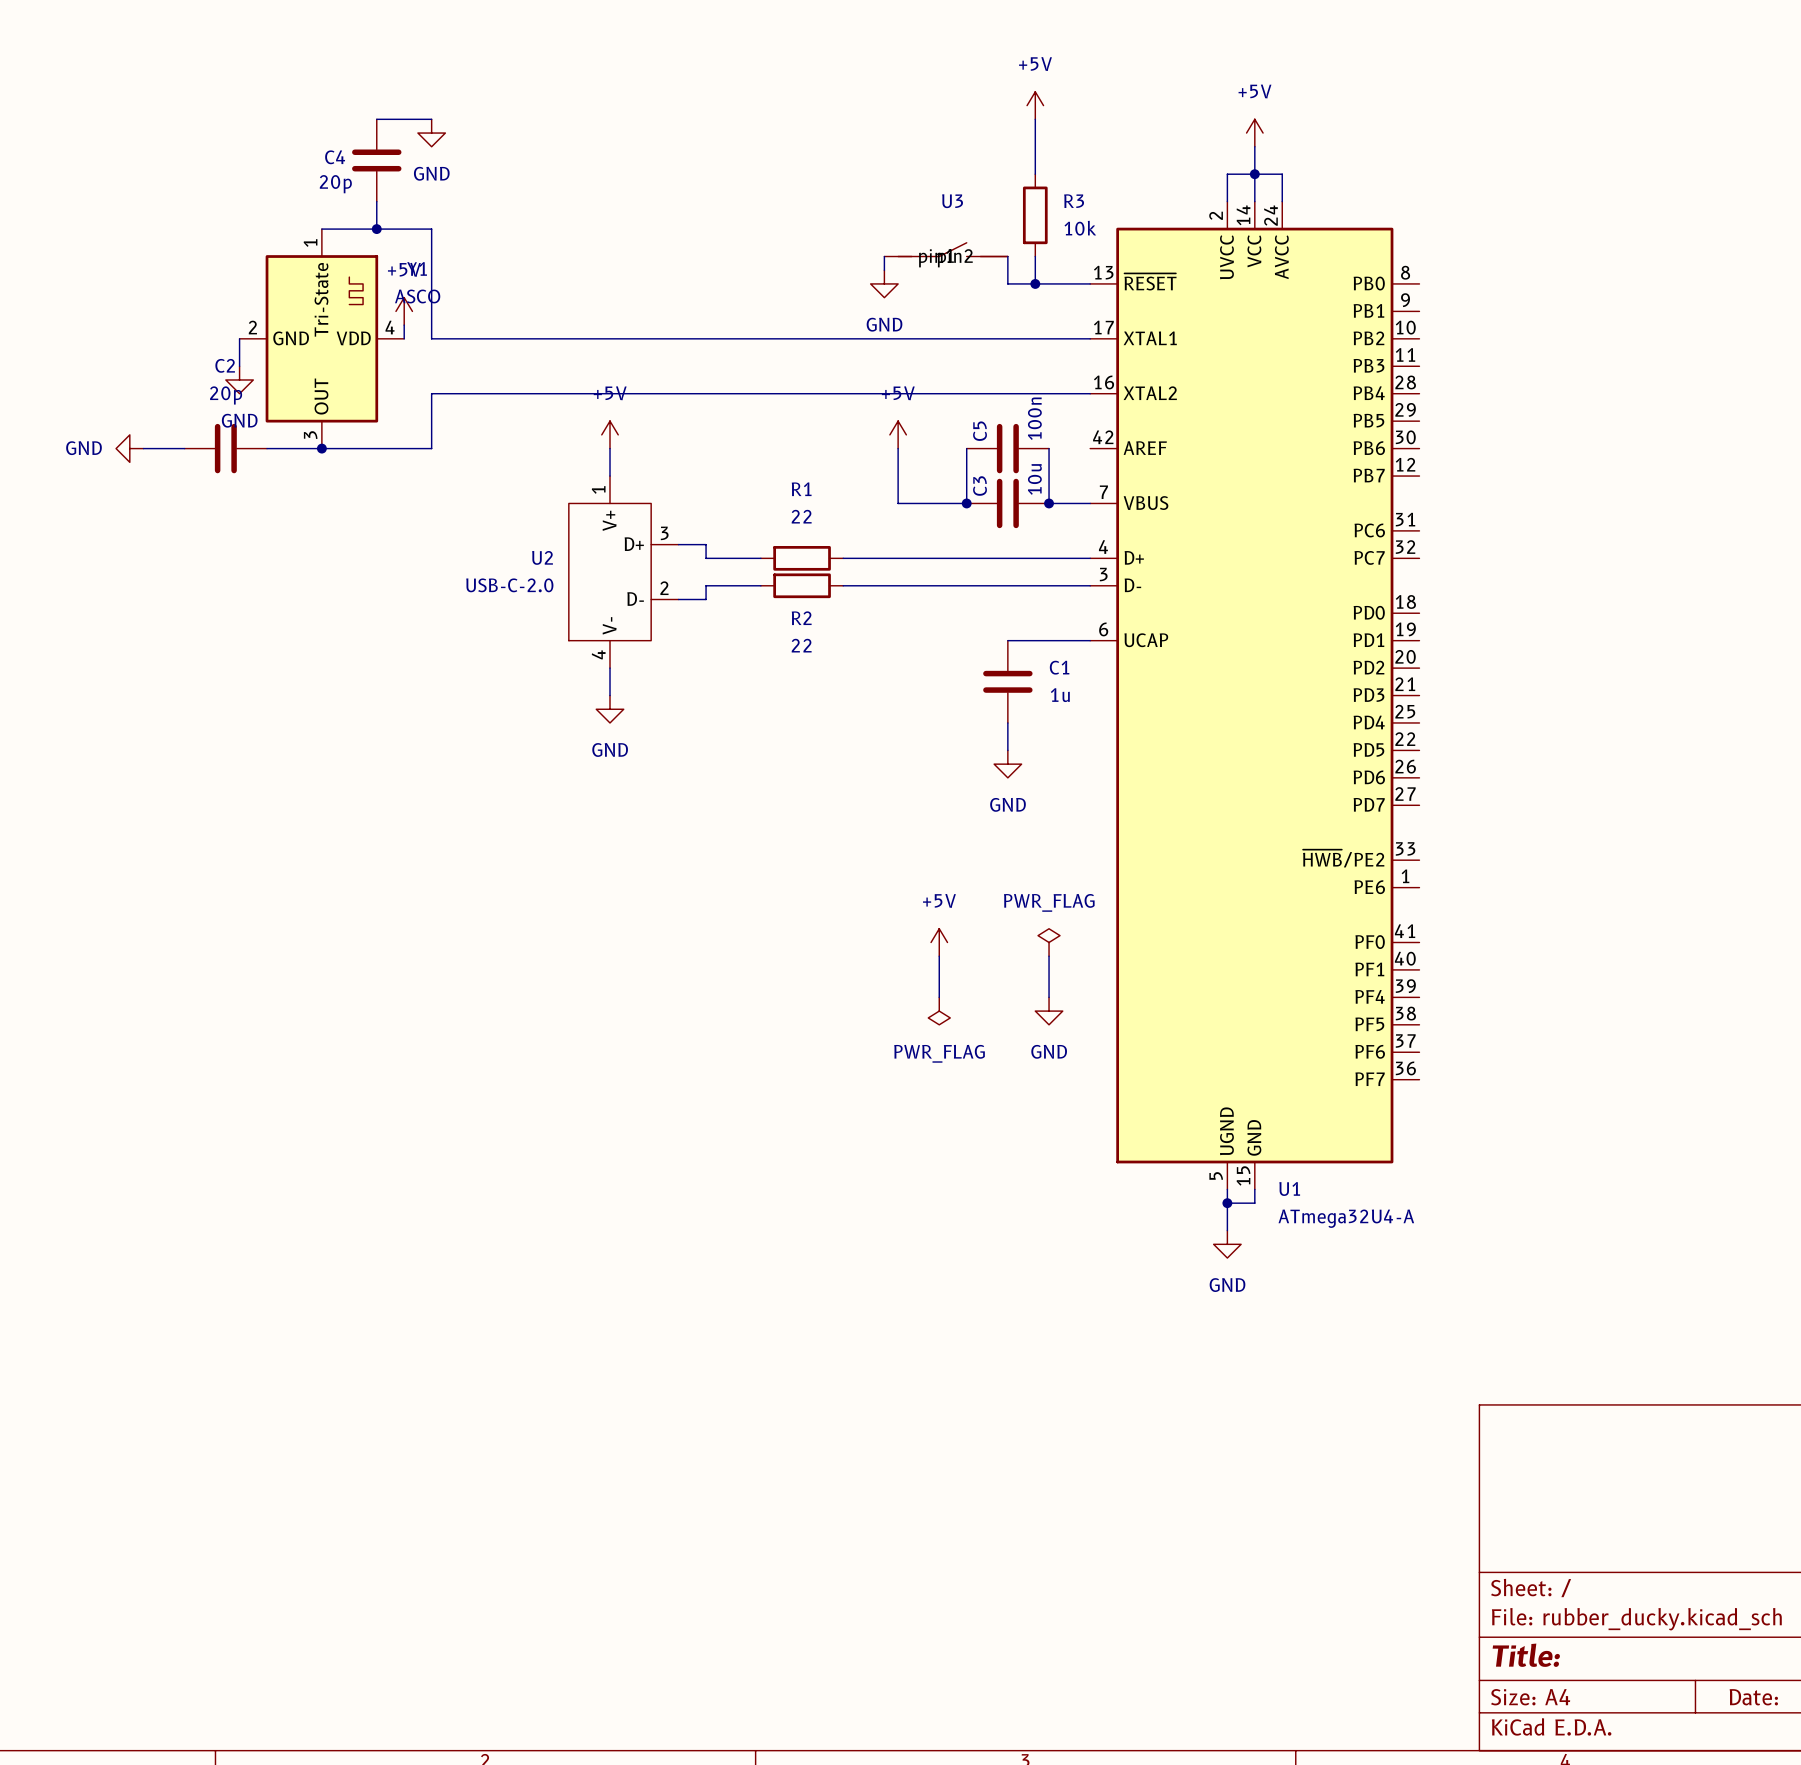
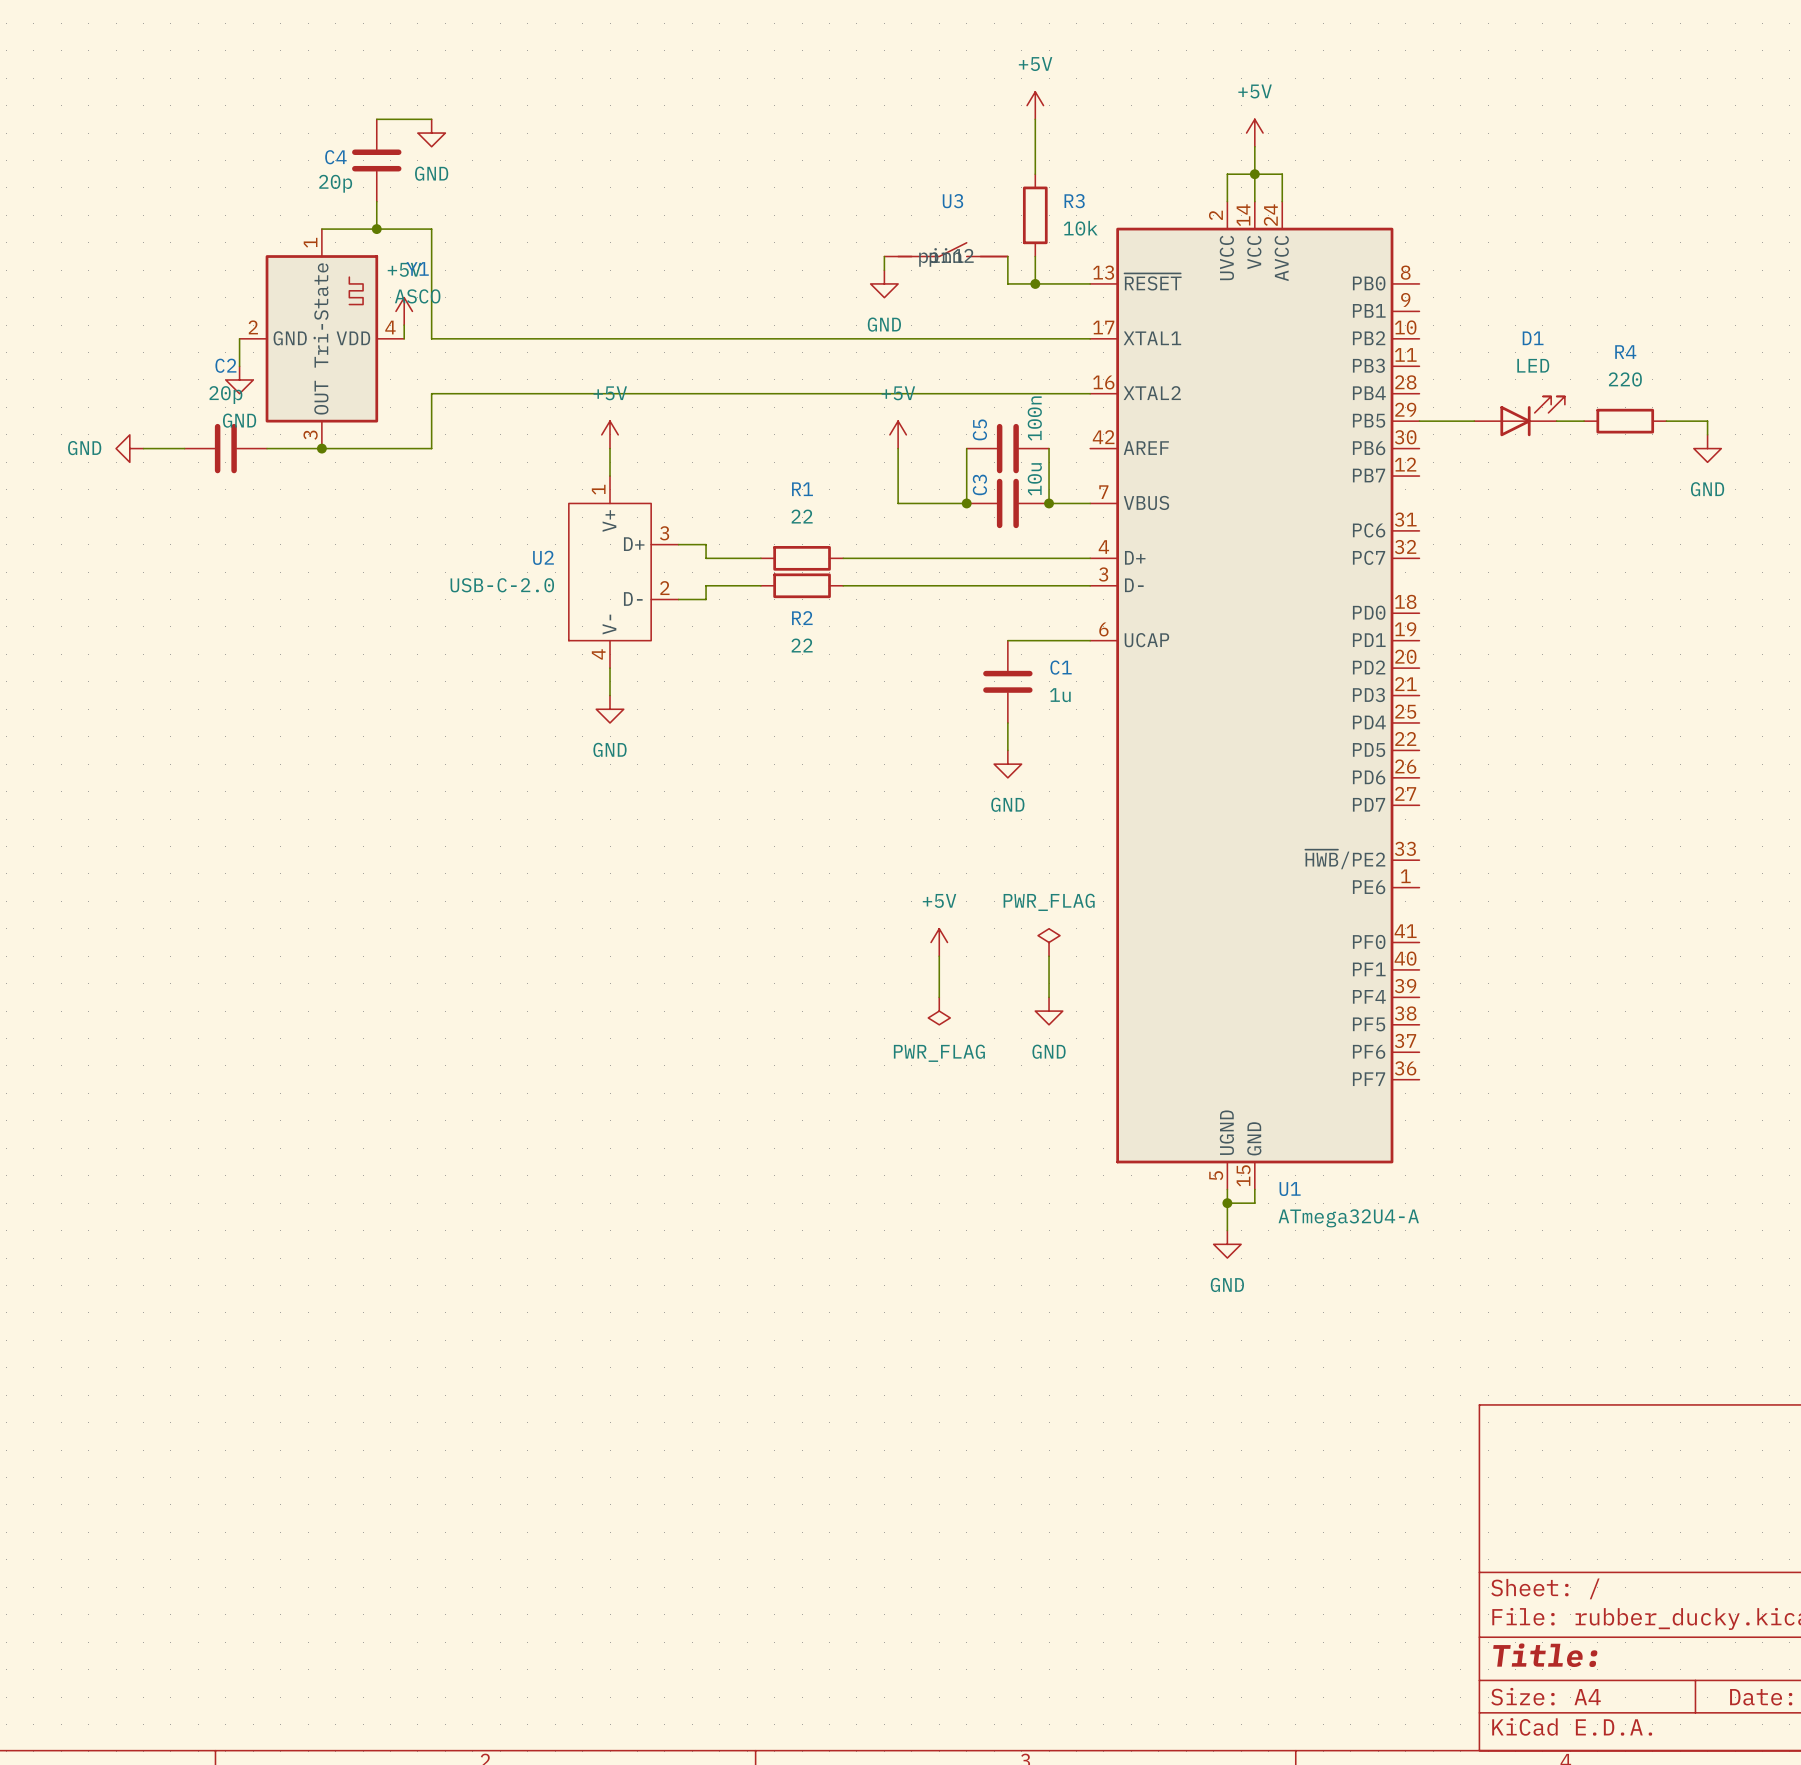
D1: none -> LED (1519, 416)
wire: none -> (1419, 421) (1474, 421)
wire: none -> (1556, 421) (1584, 421)
R4: none -> 220 (1625, 421)
wire: none -> (1666, 421) (1707, 421) (1707, 434)
power symbol: none -> GND (1707, 448)

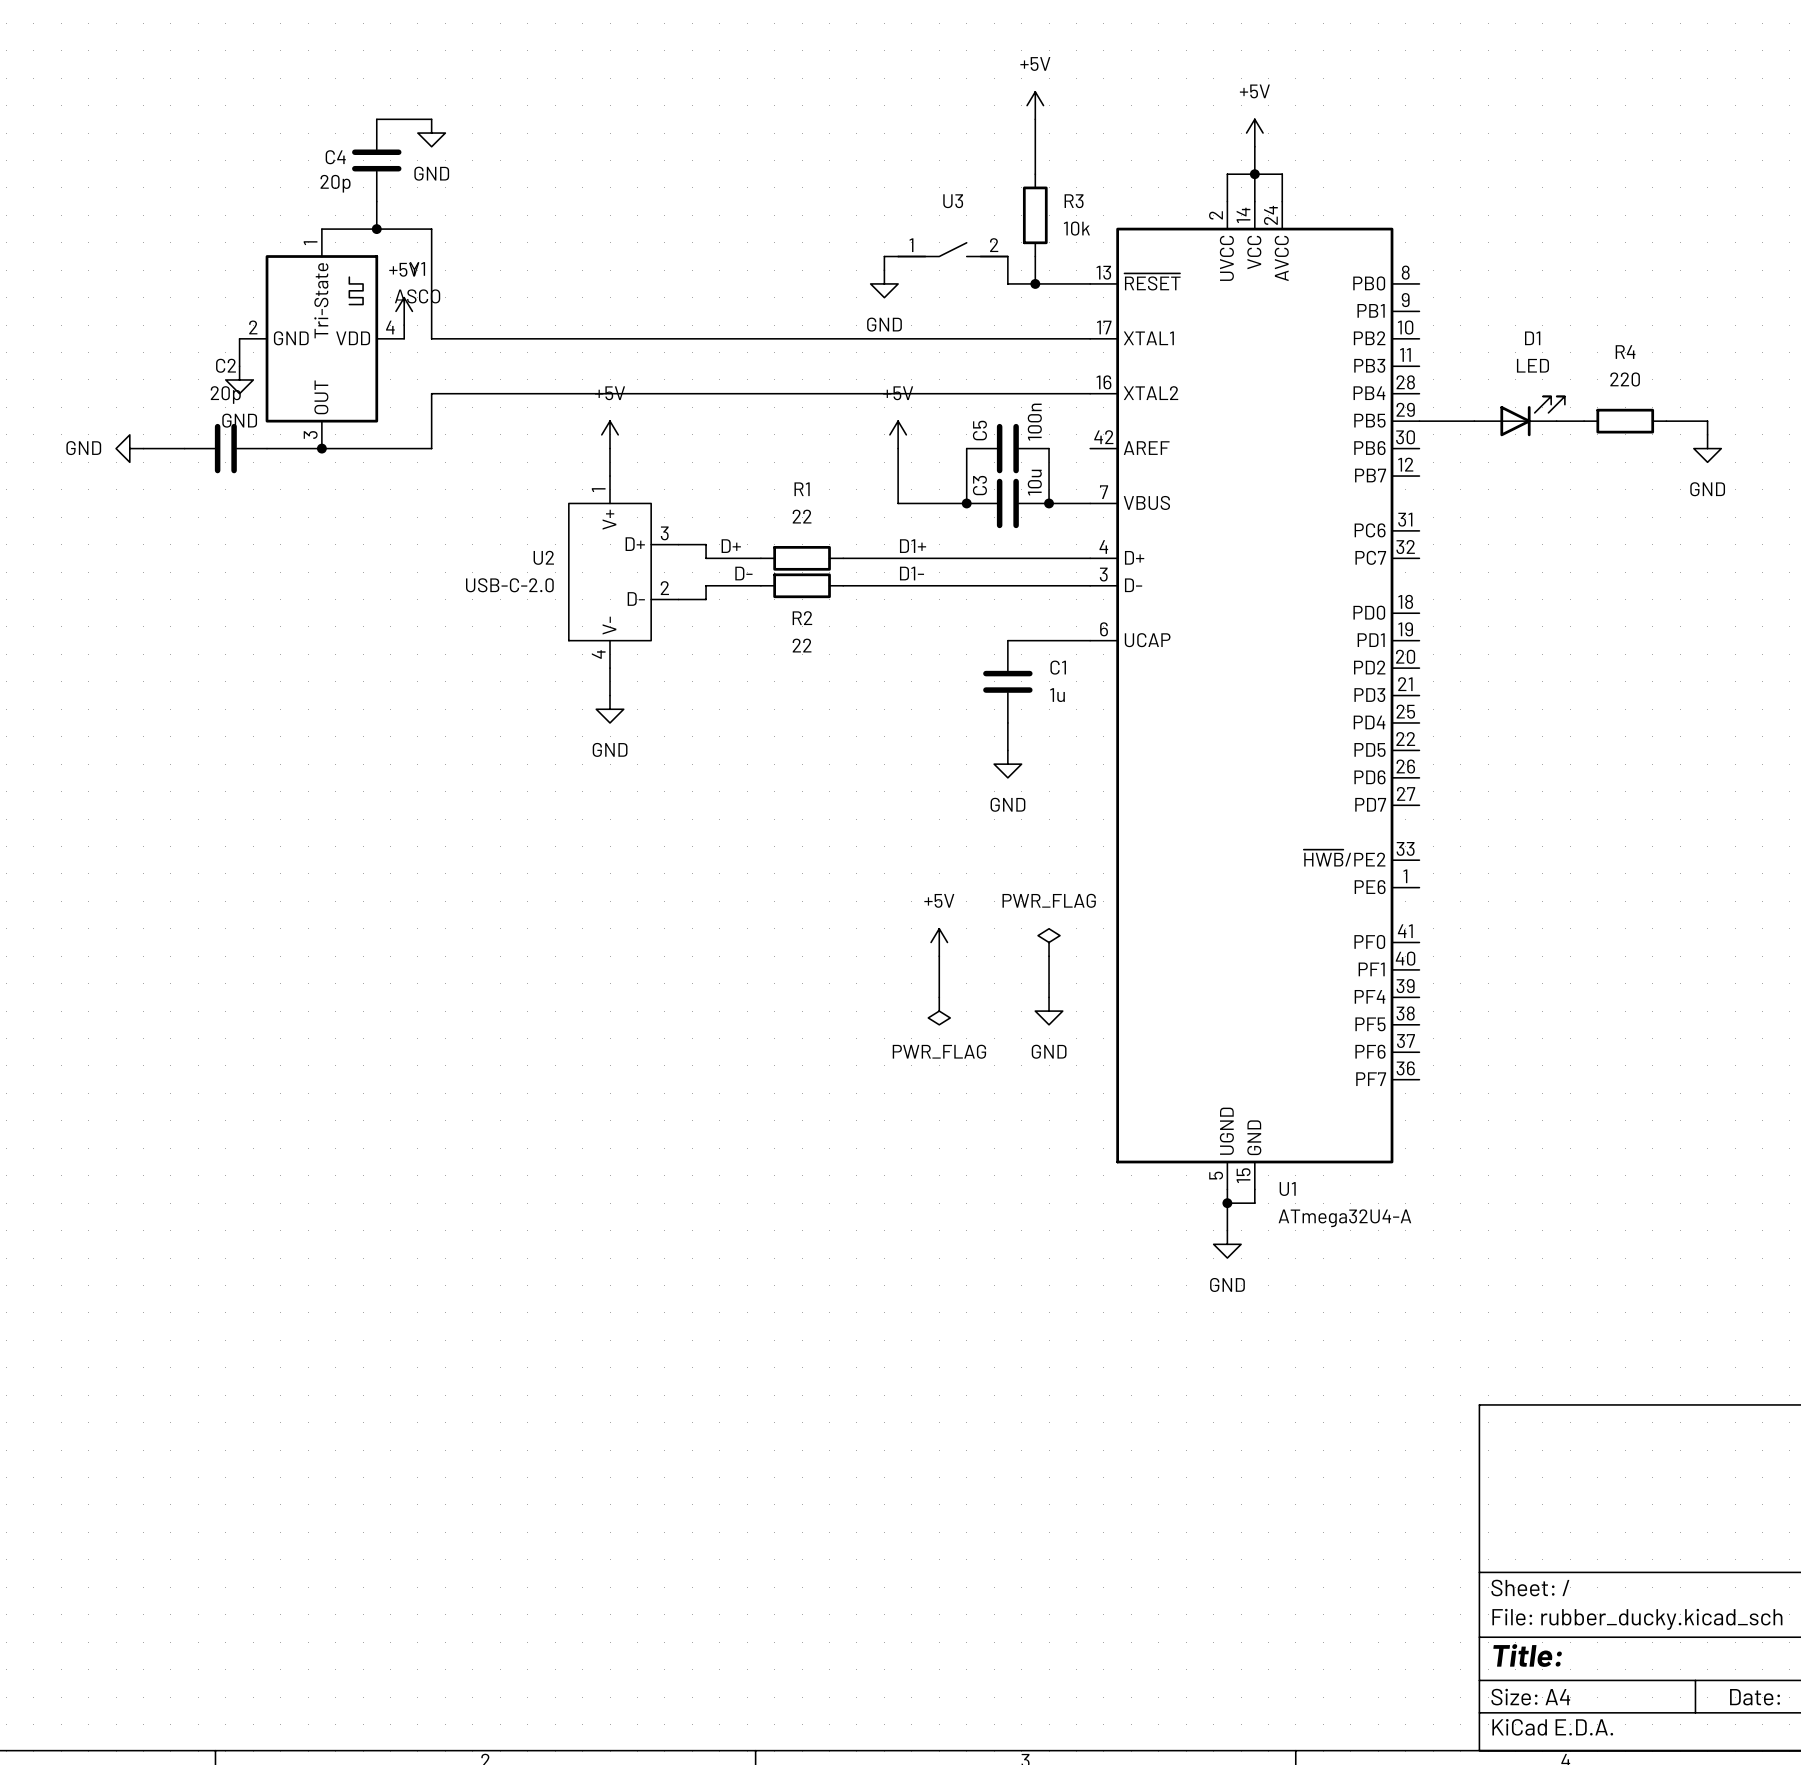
U3 symbol: [884, 242, 1008, 257] -> [898, 242, 1008, 257]
label: none -> D+ (731, 546)
label: none -> D1+ (913, 546)
label: none -> D- (743, 573)
label: none -> D1- (912, 573)

